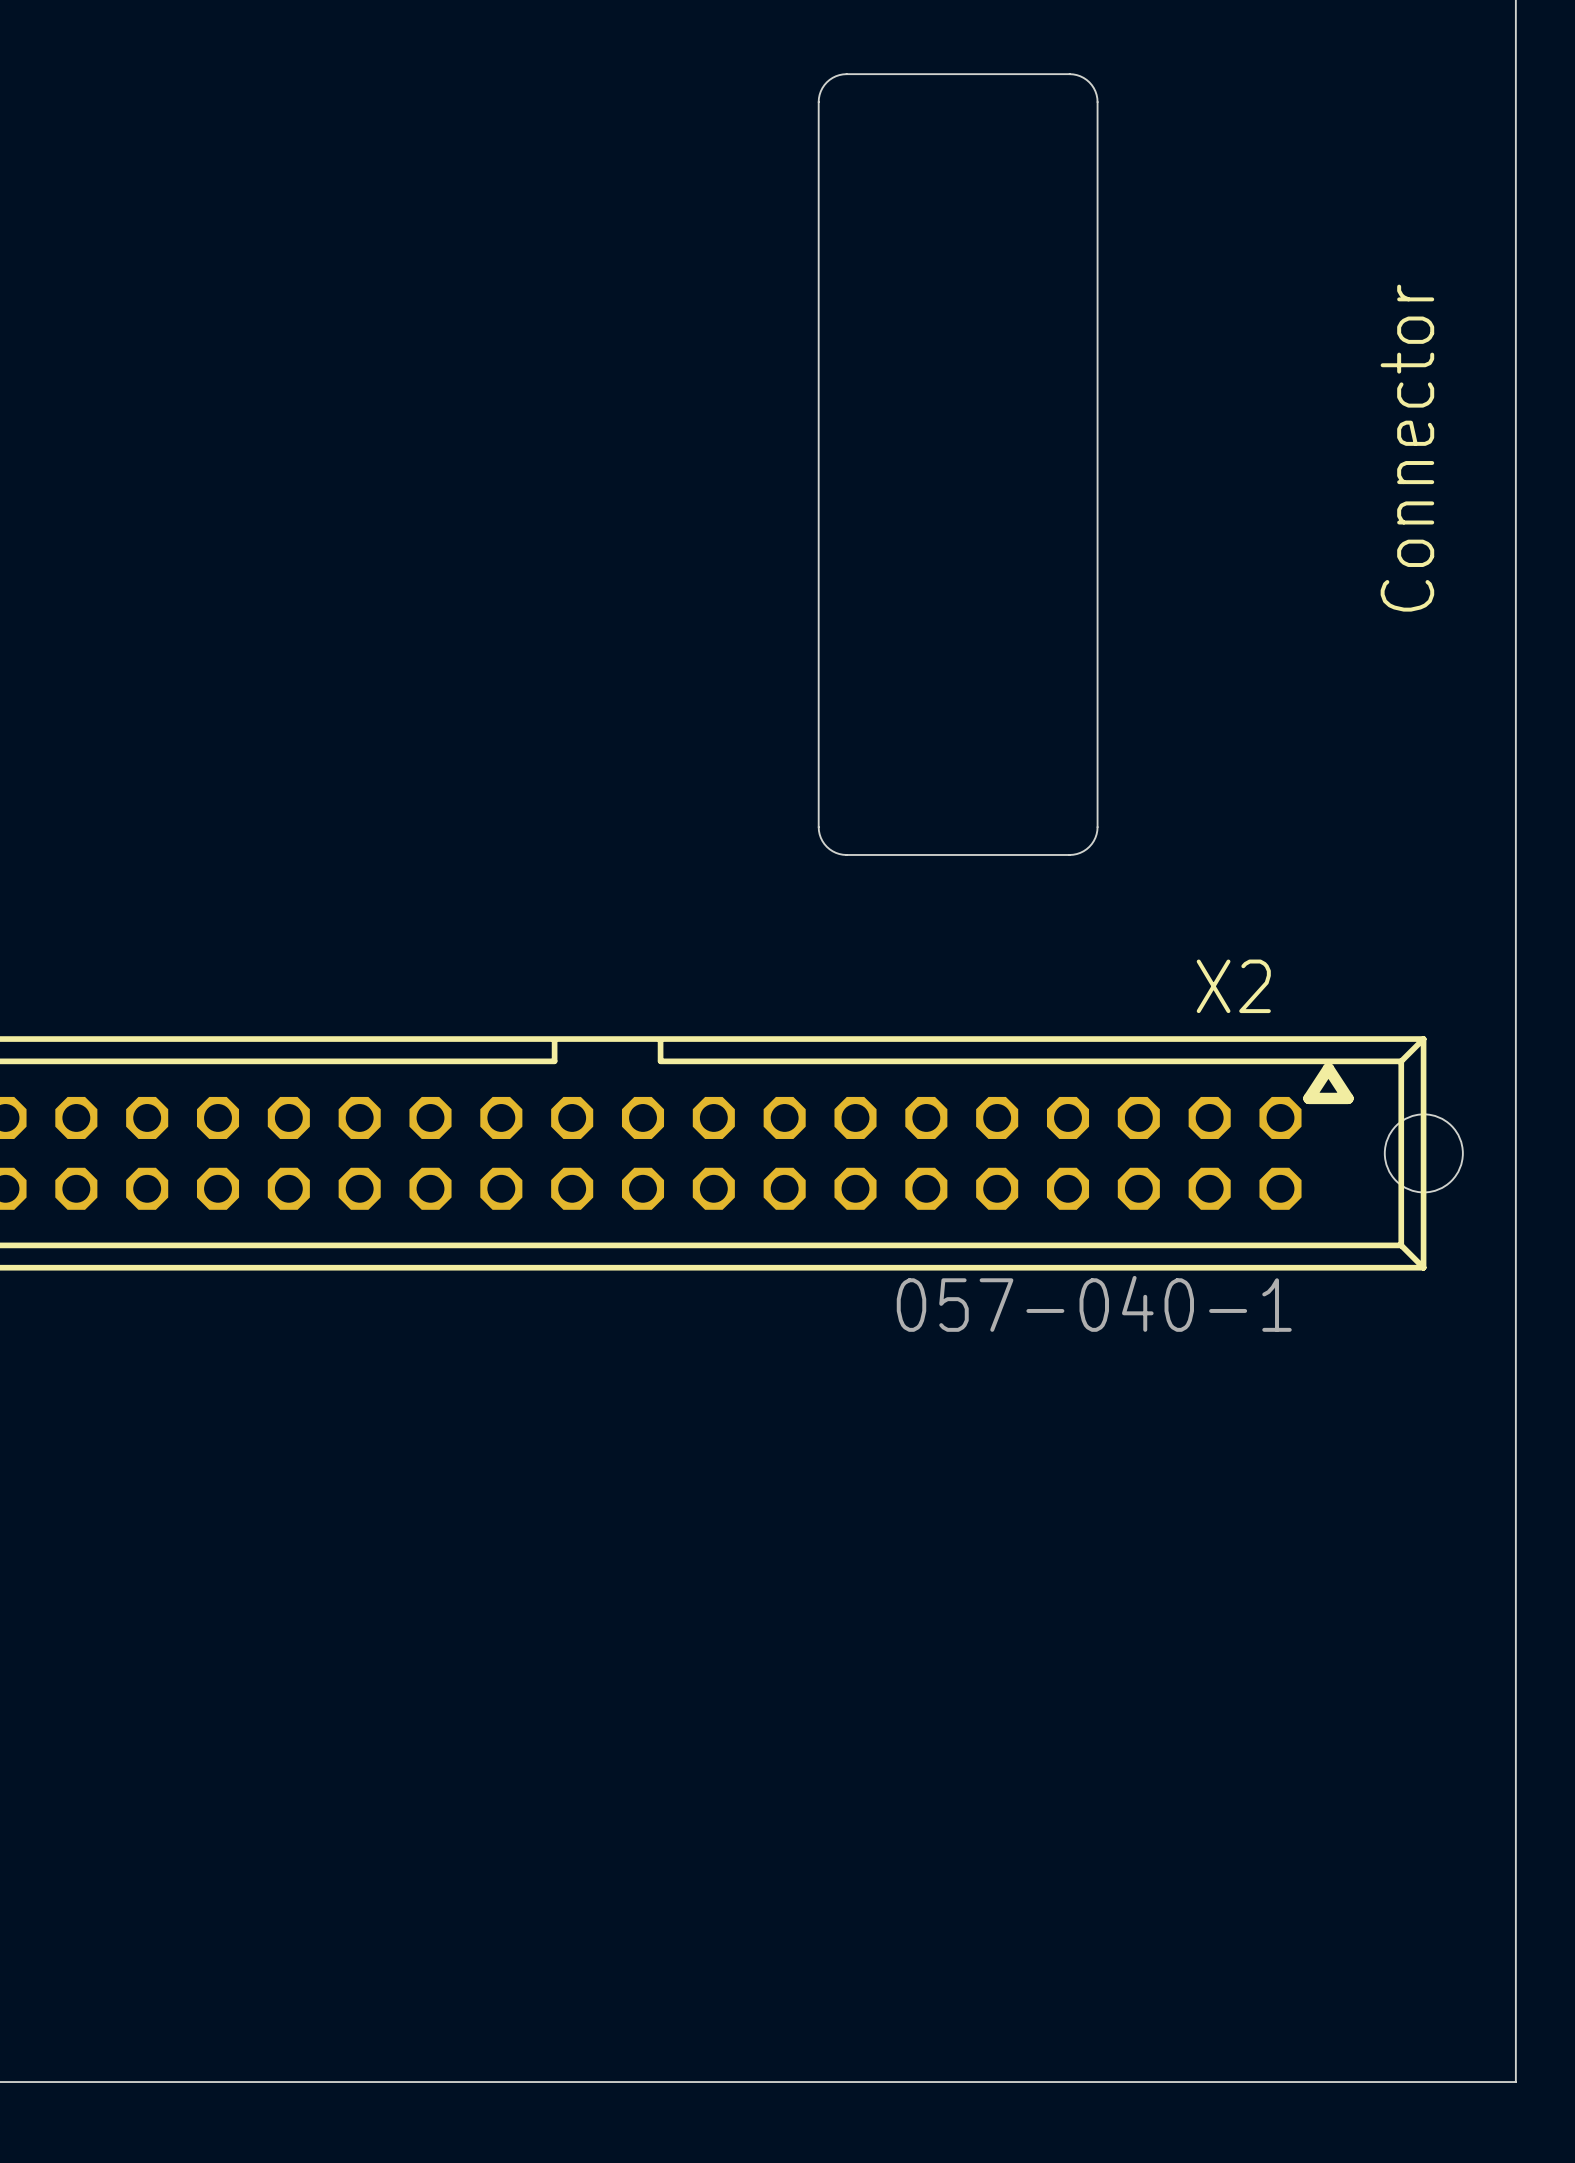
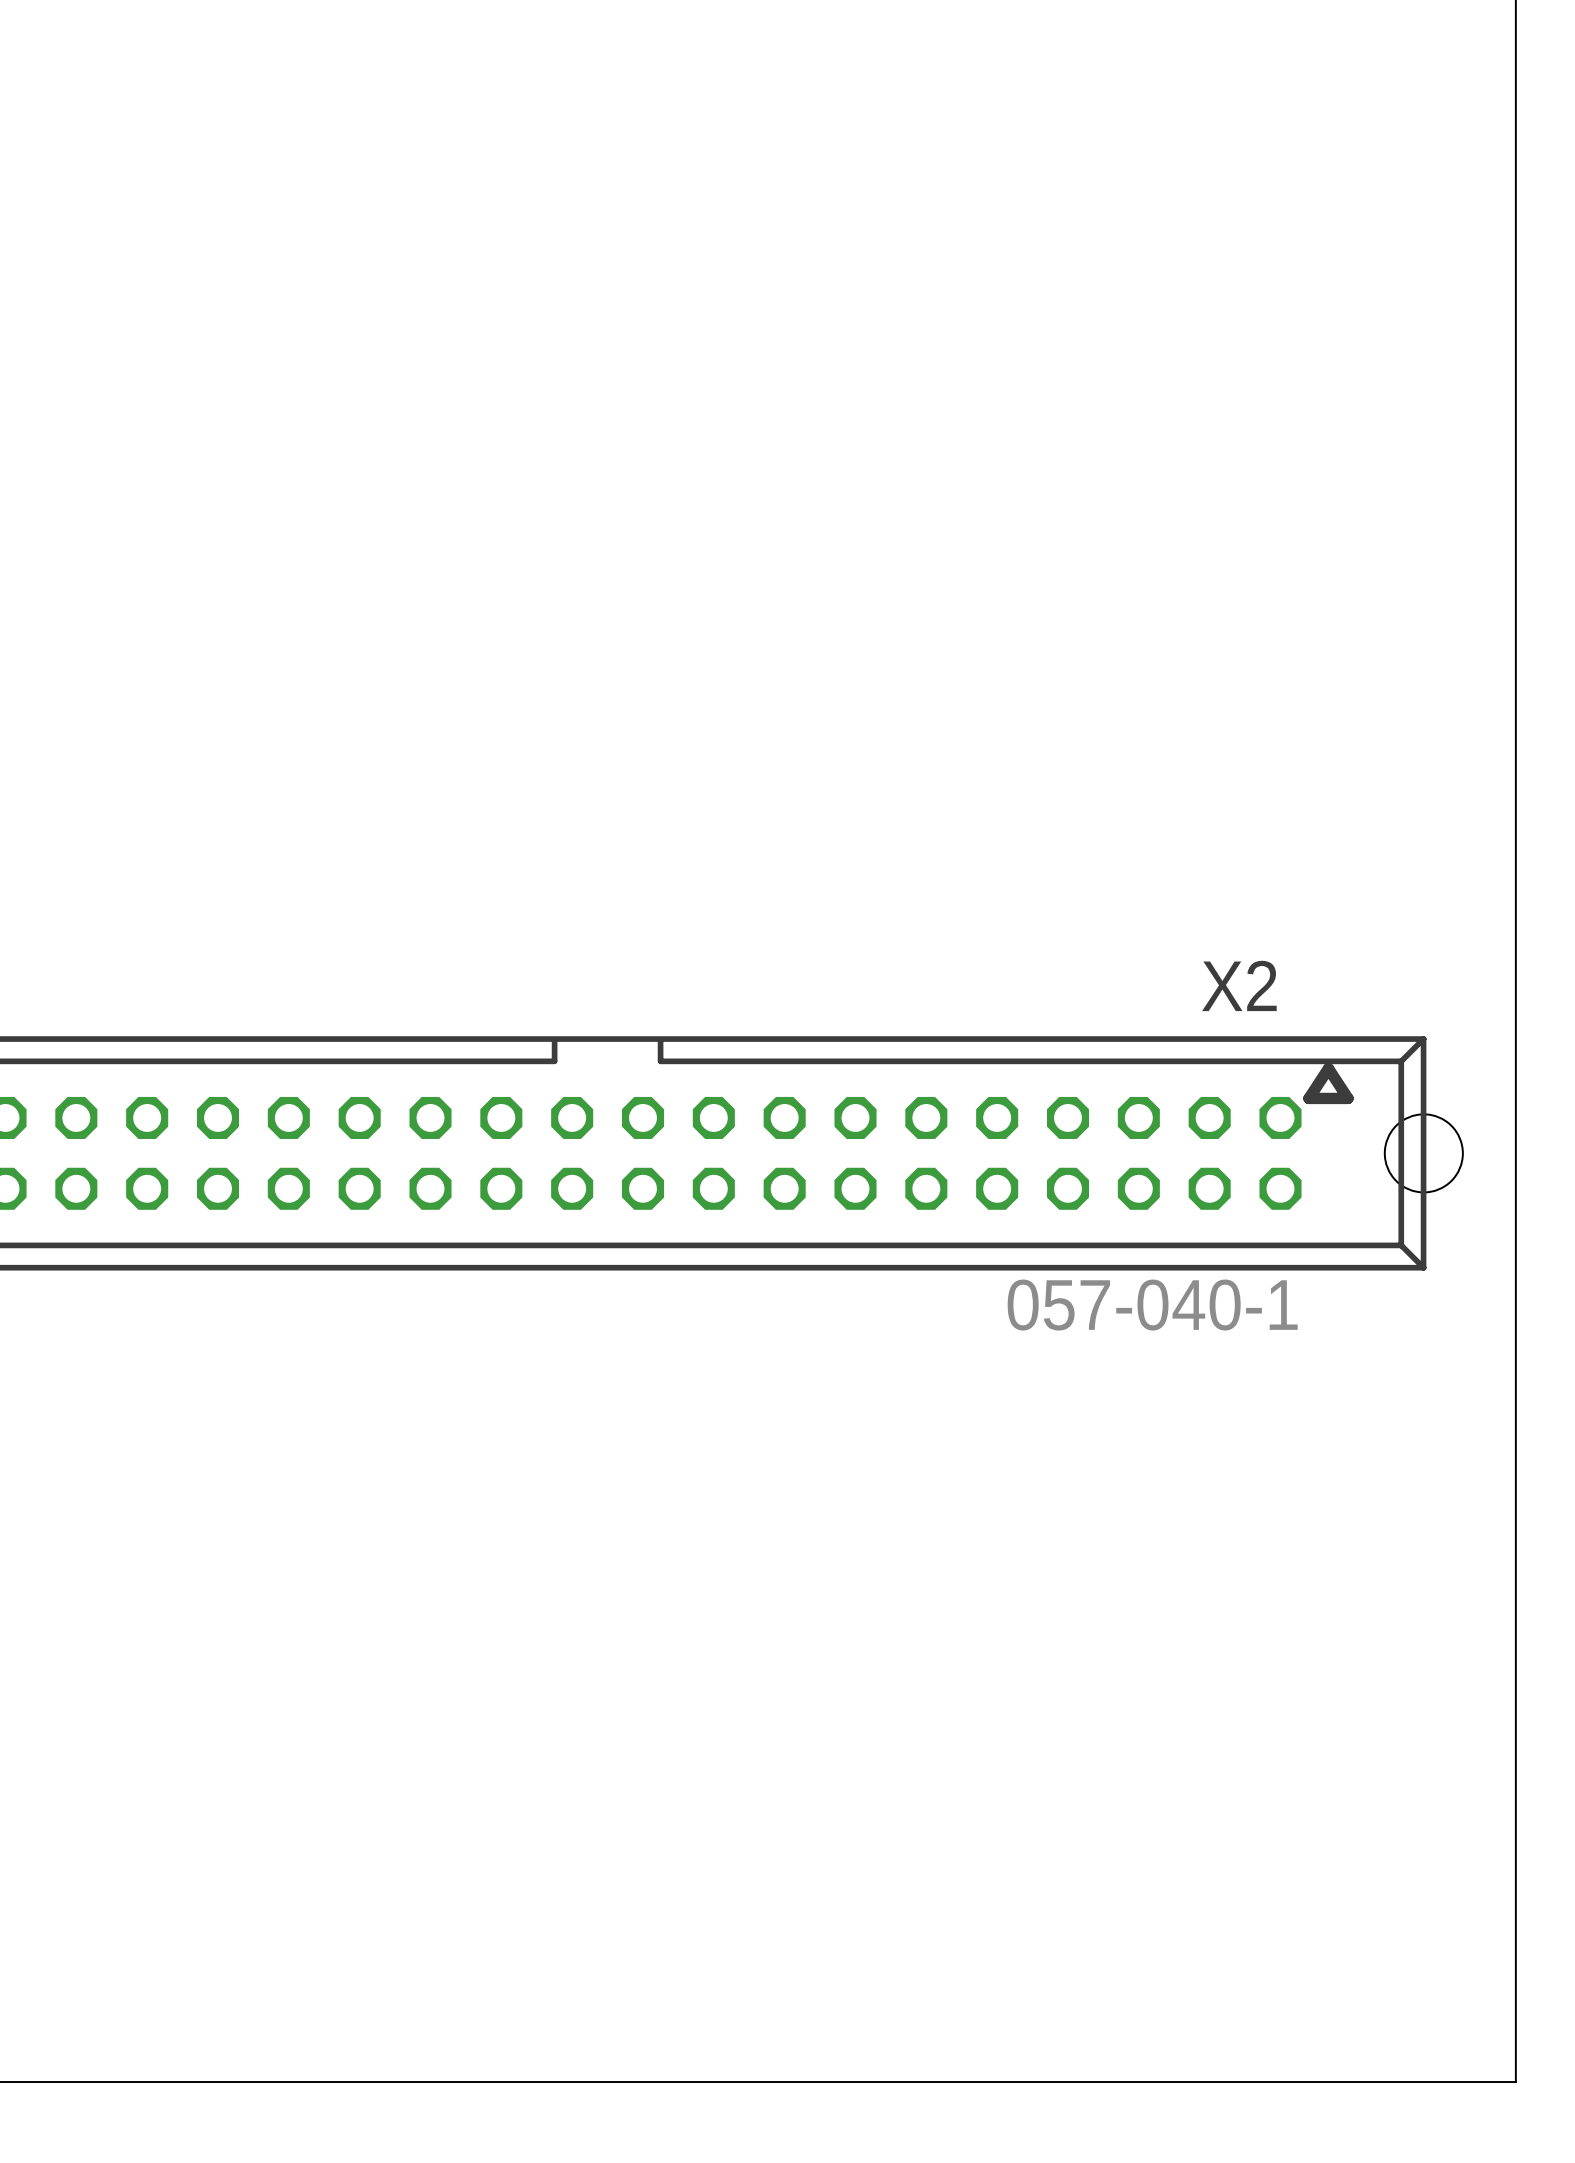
board edge: (846, 74) (1073, 74) (1086, 79) (1096, 94) (1097, 827) (1091, 844) (1076, 854) (842, 854) (829, 849) (819, 834) (818, 102) (820, 91) (826, 82) (835, 76) (846, 74) -> none
text: Connector (1407, 448) -> none

